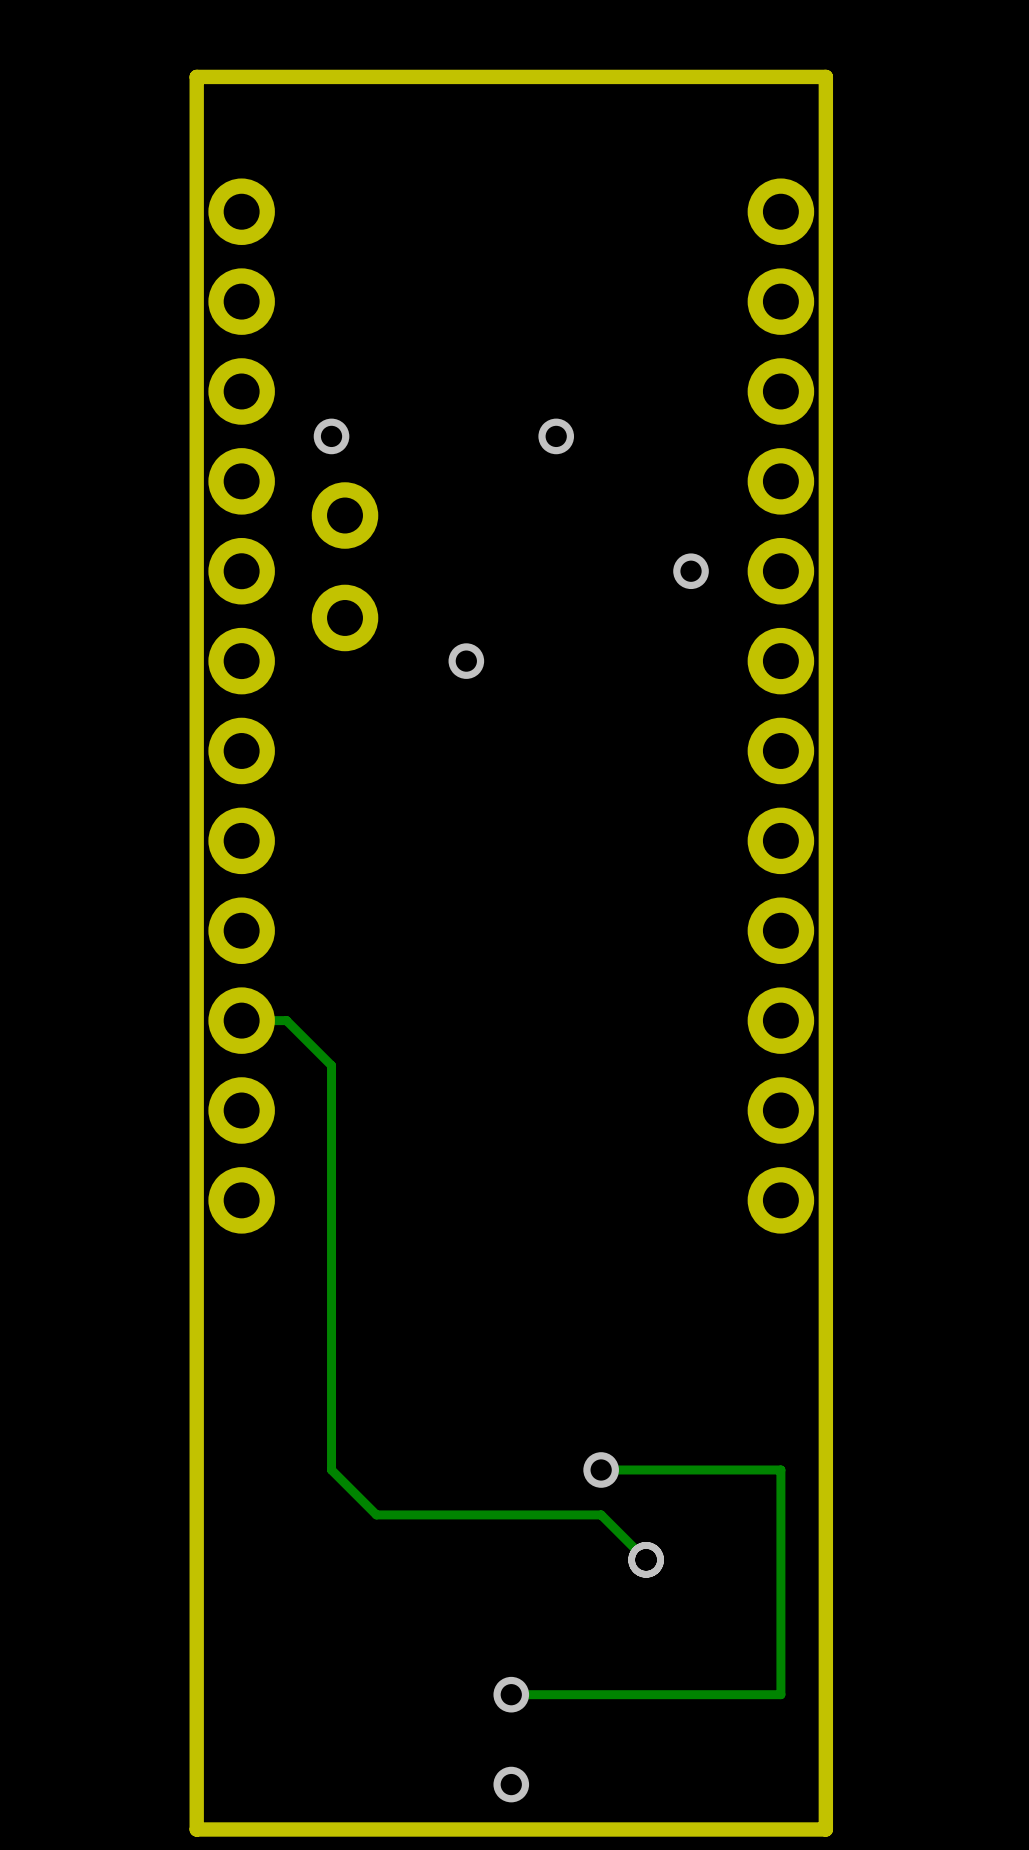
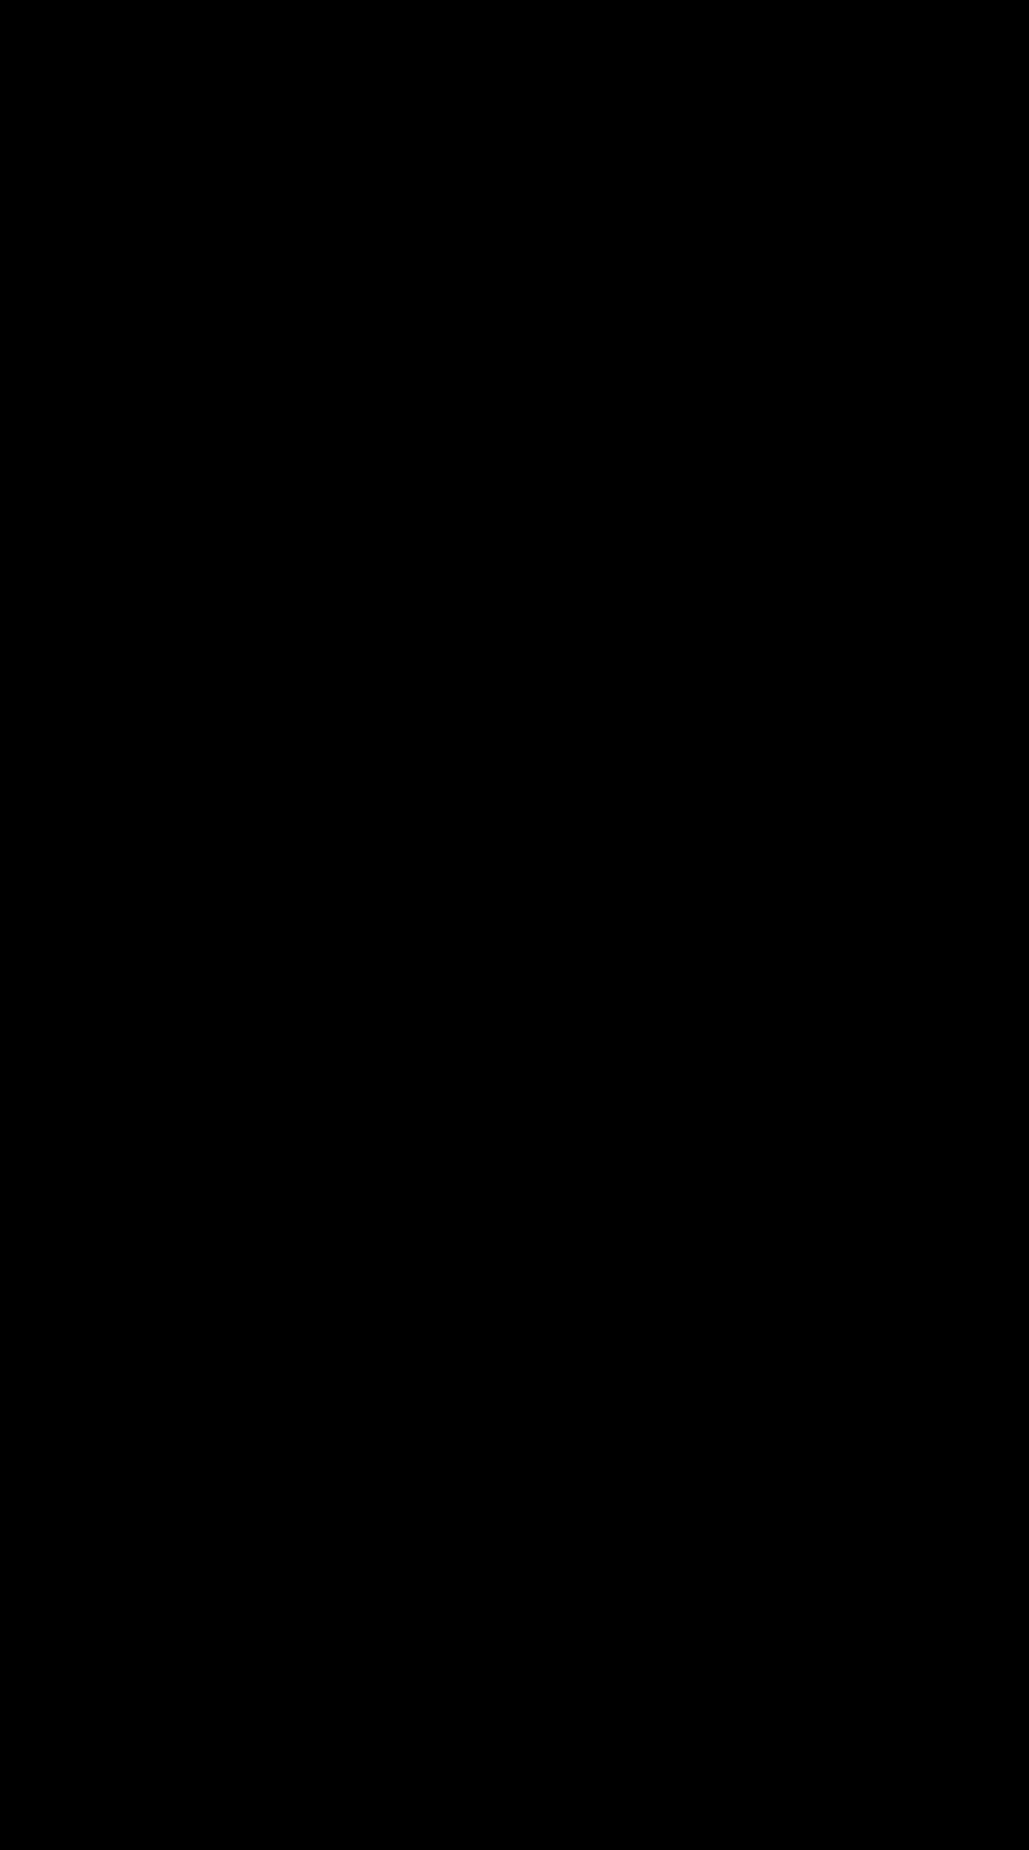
board edge: (825, 76) (825, 1829) (196, 1829) (196, 76) (825, 76) -> none
via: (331, 436) -> none
via: (556, 436) -> none
part: (345, 566) -> none
via: (691, 571) -> none
via: (466, 661) -> none
part: (241, 706) -> none
part: (780, 706) -> none
track: (241, 1020) (286, 1020) (331, 1065) (331, 1469) (376, 1514) (601, 1514) (646, 1559) -> none
track: (601, 1469) (780, 1469) (780, 1694) (511, 1694) -> none
via: (601, 1469) -> none
via: (646, 1559) -> none
via: (511, 1694) -> none
via: (511, 1784) -> none

